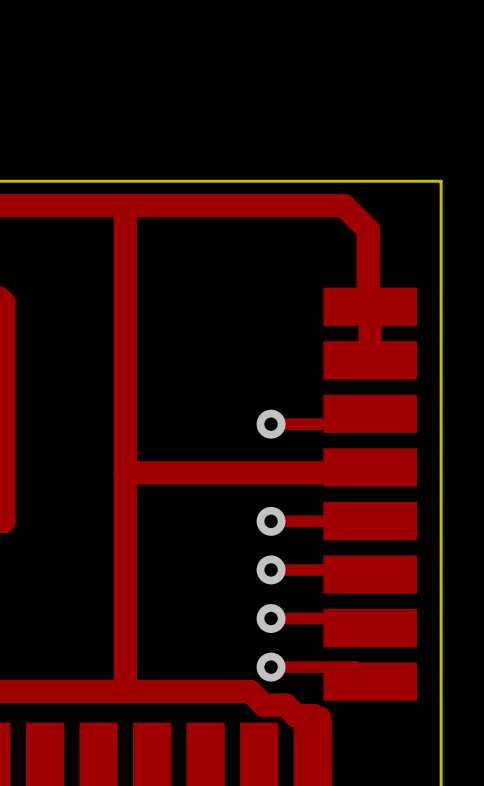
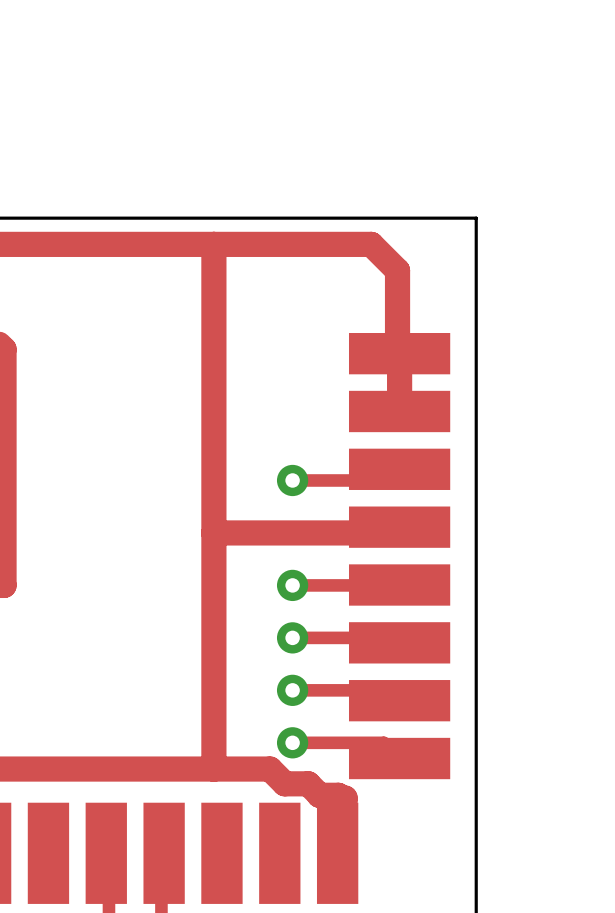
track: (125, 205) (125, 691) -> (213, 244) (213, 769)
track: (125, 472) (198, 472) -> none

